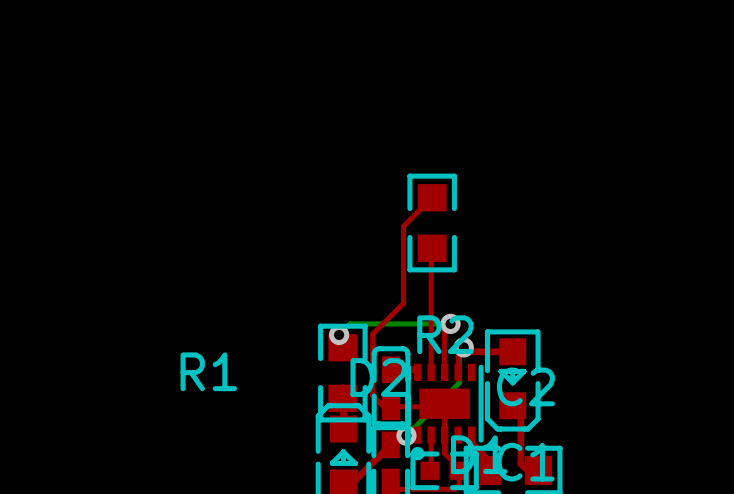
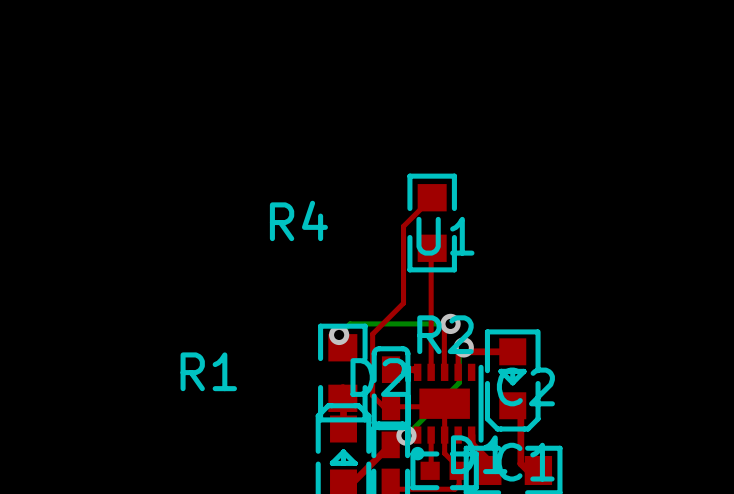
R4 name: none -> R4 (298, 220)
U1 name: none -> U1 (445, 236)

